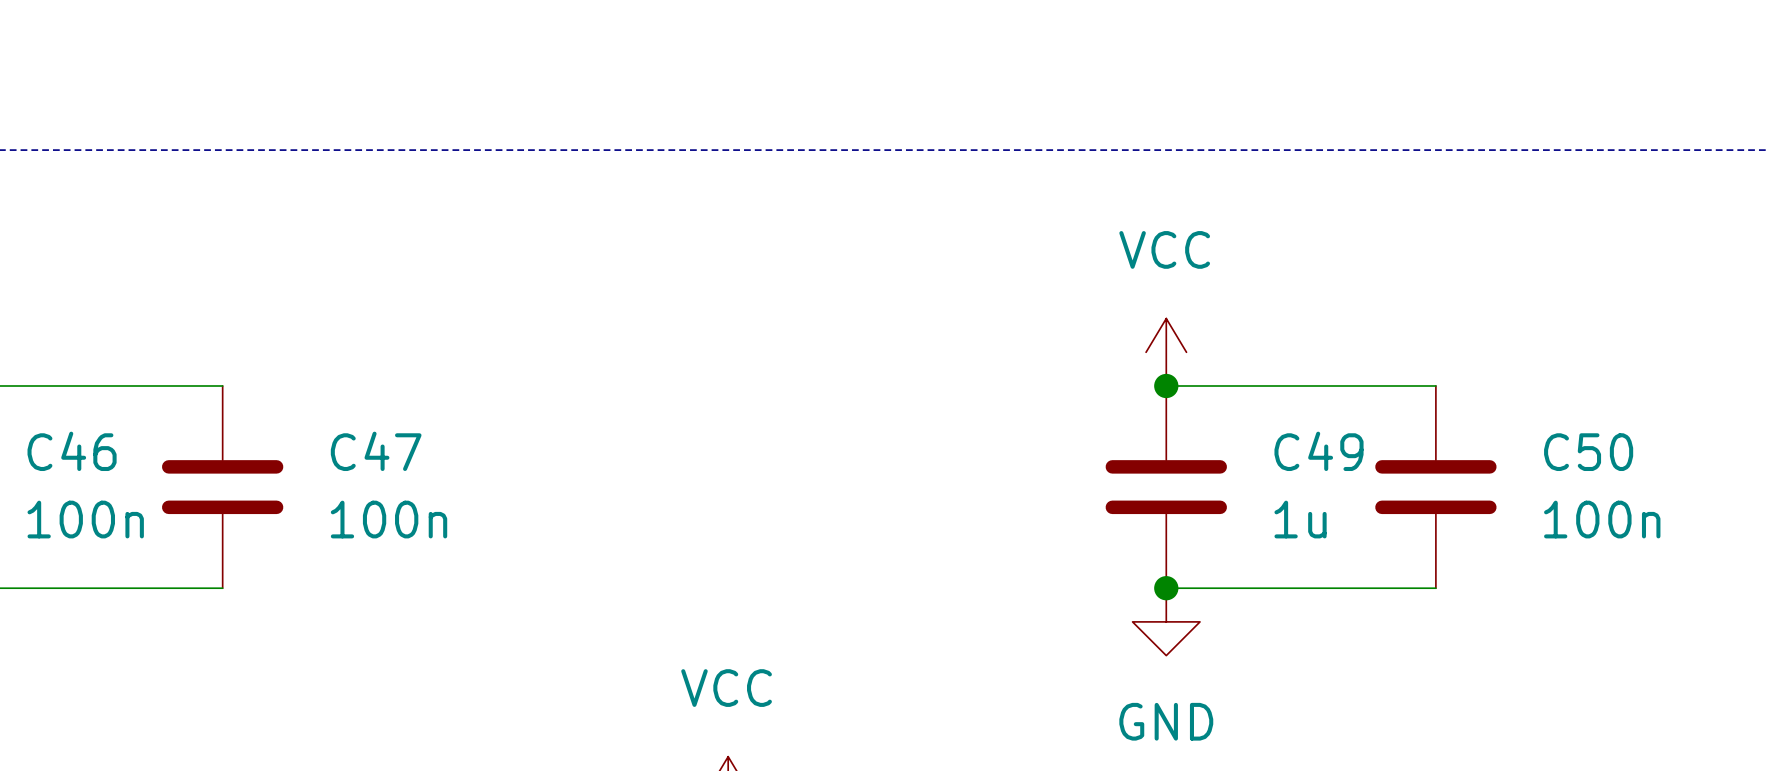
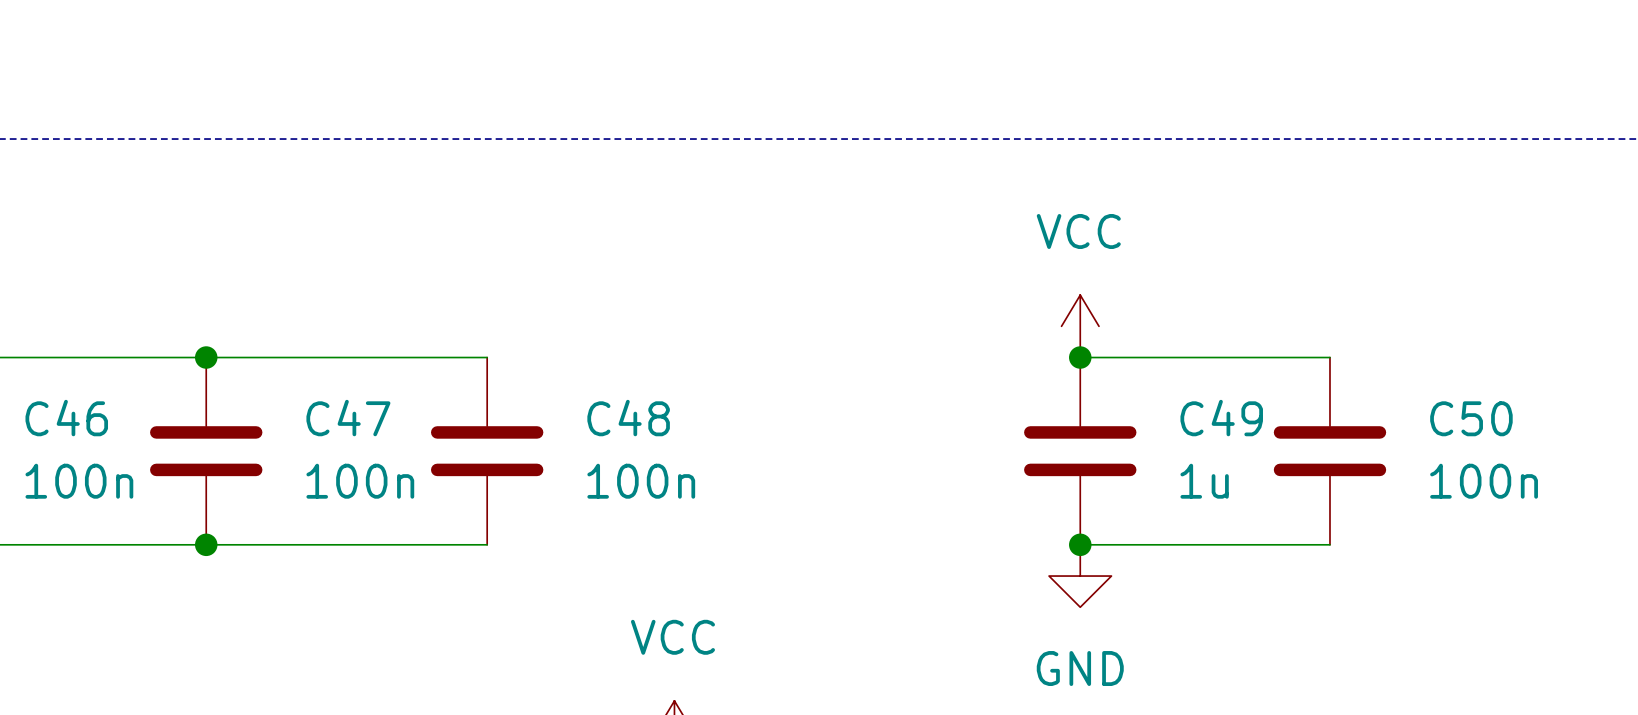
wire: none -> (206, 357) (487, 357)
junction: none -> (206, 357)
C48: none -> 100n (487, 451)
wire: none -> (206, 544) (487, 544)
junction: none -> (206, 544)

